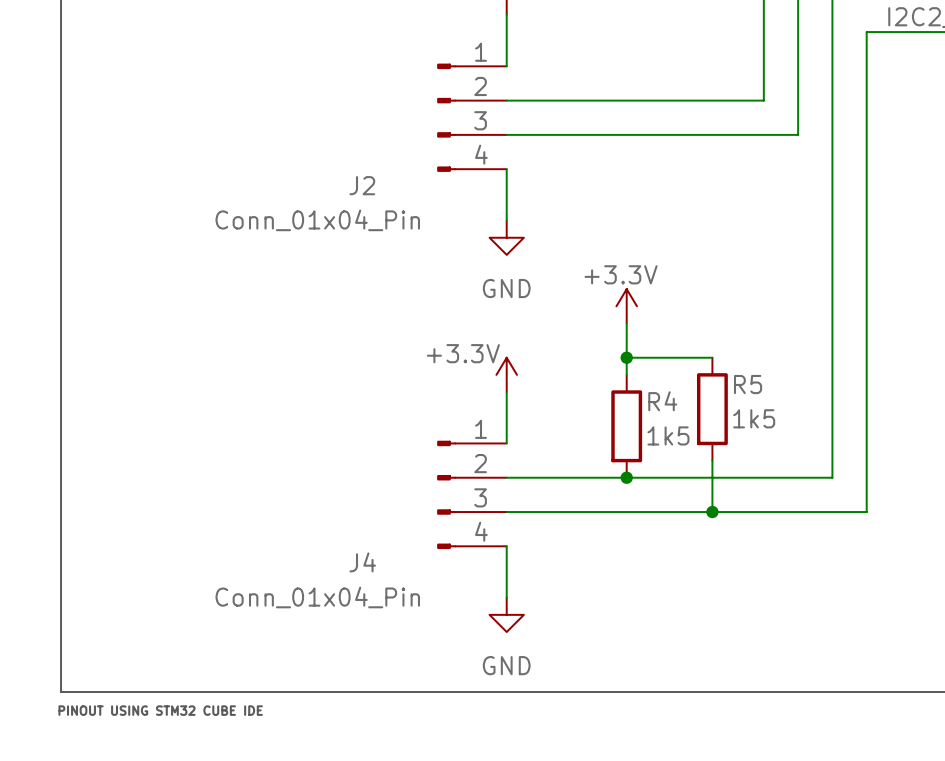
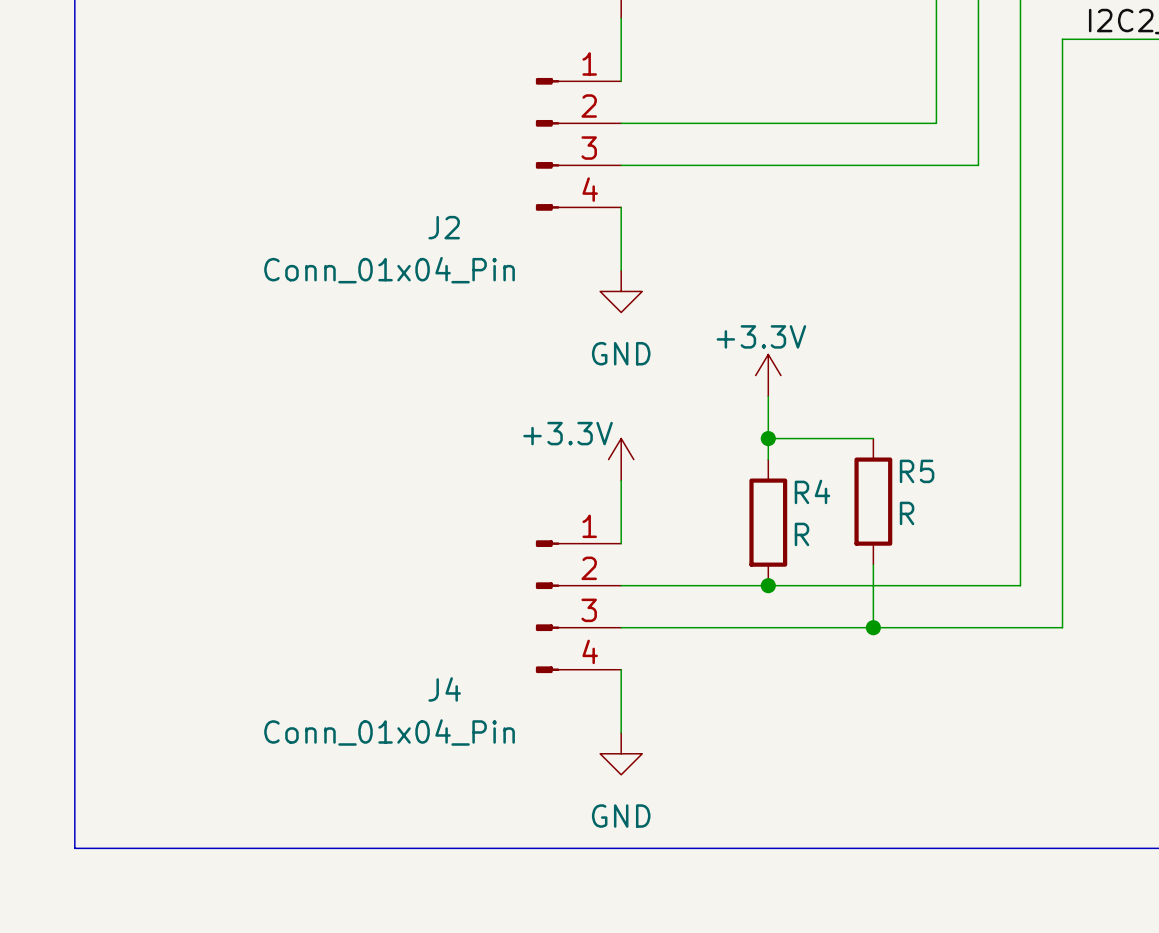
R5 value: 1k5 (754, 418) -> R (907, 513)
R4 value: 1k5 (668, 435) -> R (801, 534)
text: PINOUT USING STM32 CUBE IDE (160, 710) -> none

